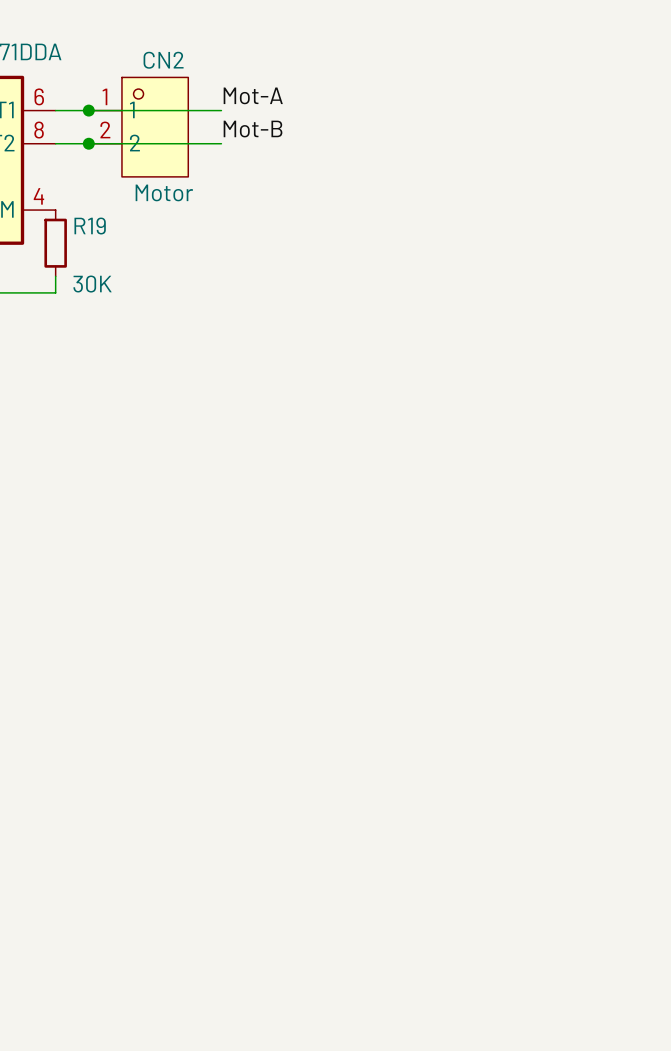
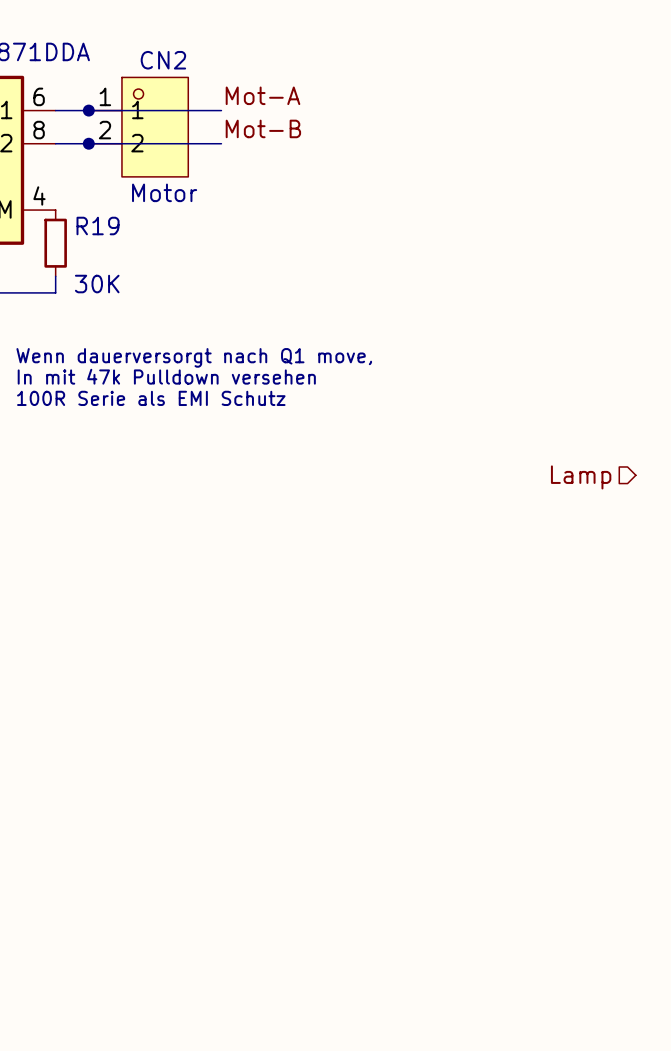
text: none -> Wenn dauerversorgt nach Q1 move, (194, 357)
text: none -> In mit 47k Pulldown versehen (166, 376)
text: none -> 100R Serie als EMI Schutz (151, 398)
hierarchical label: none -> Lamp (581, 477)

